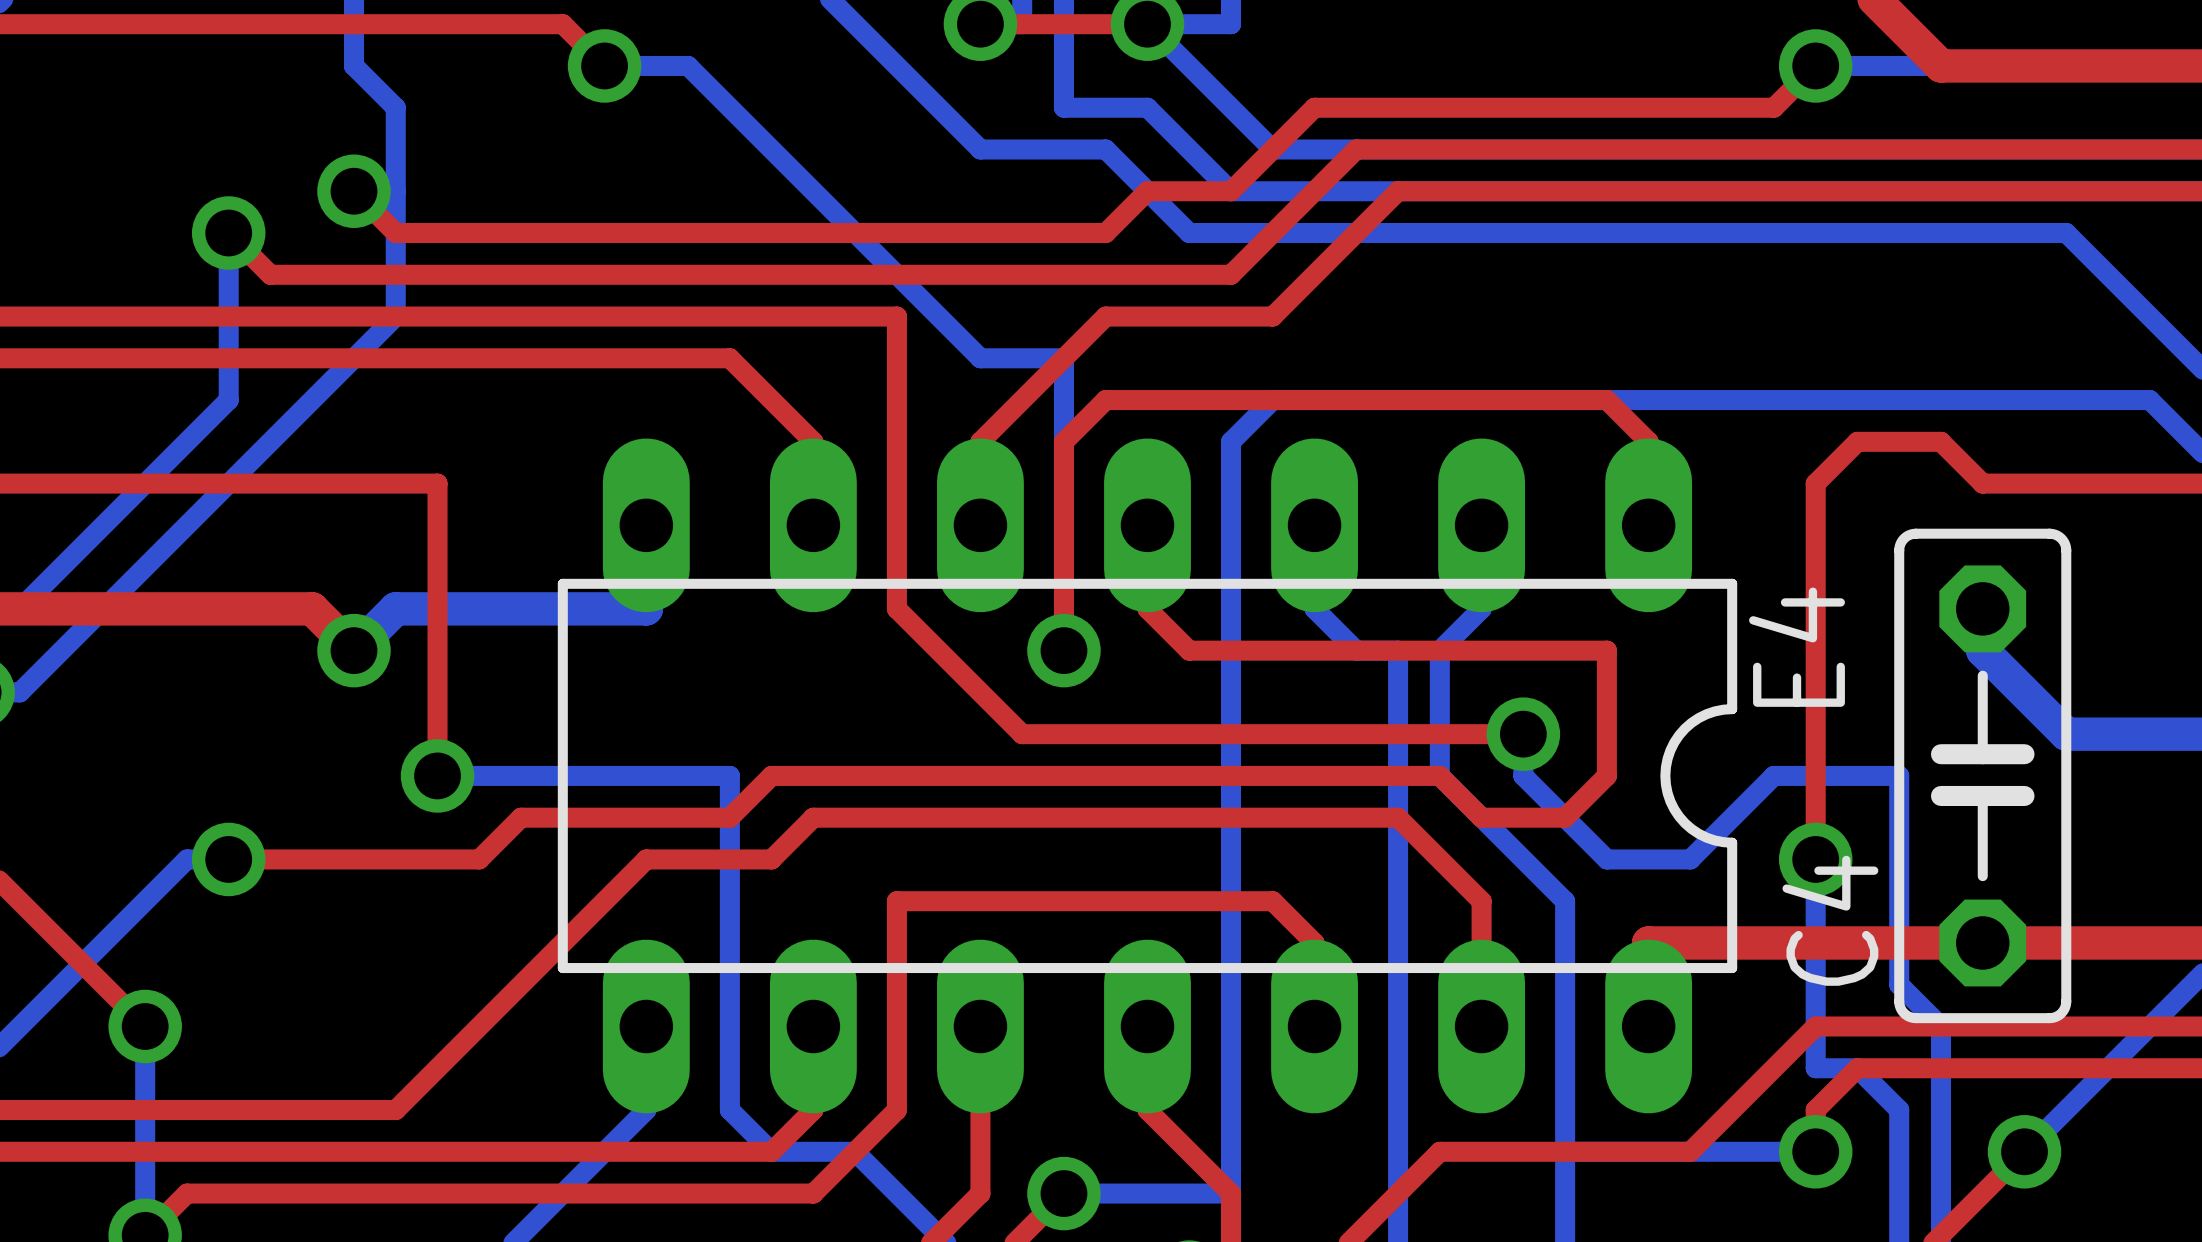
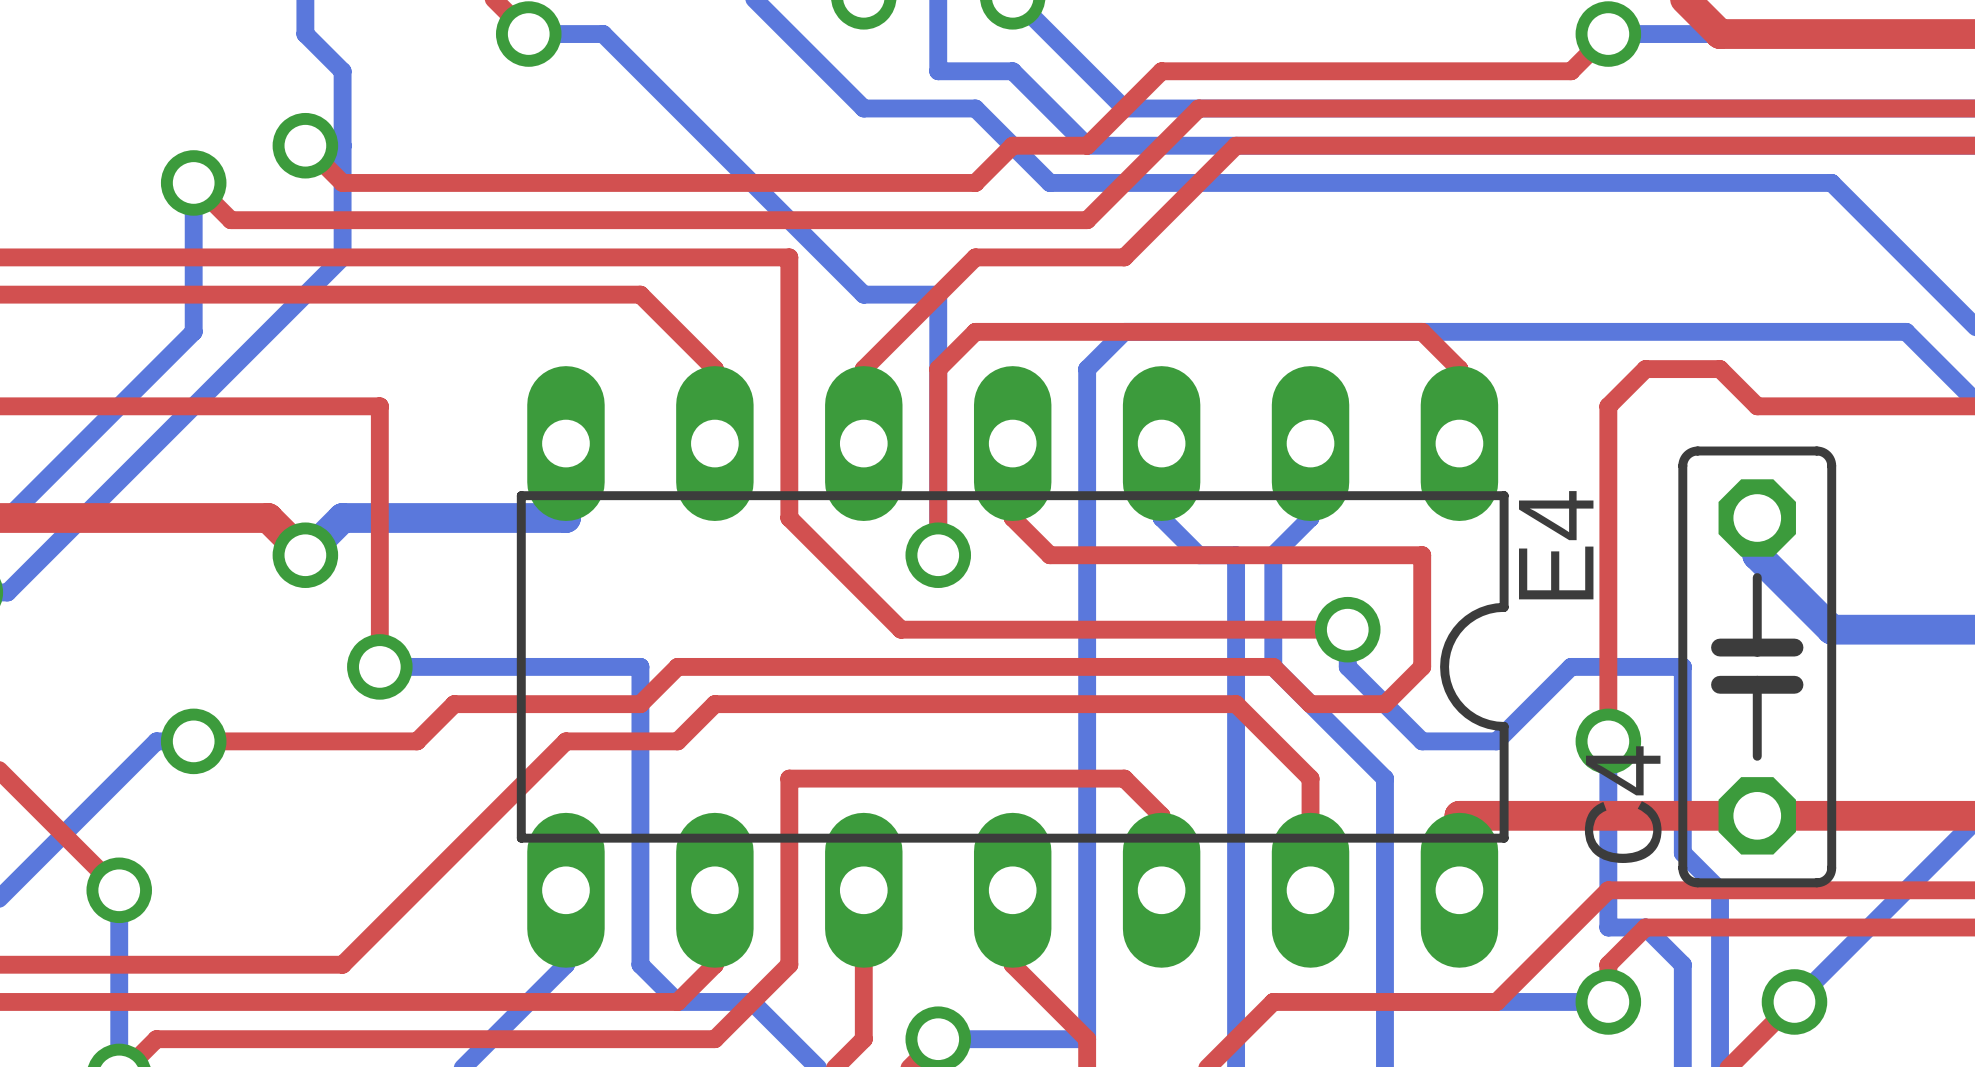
E4 footprint: [557, 438, 1738, 1114] -> [516, 366, 1509, 968]
E4 name position: E4 (1797, 647) -> E4 (1556, 545)

